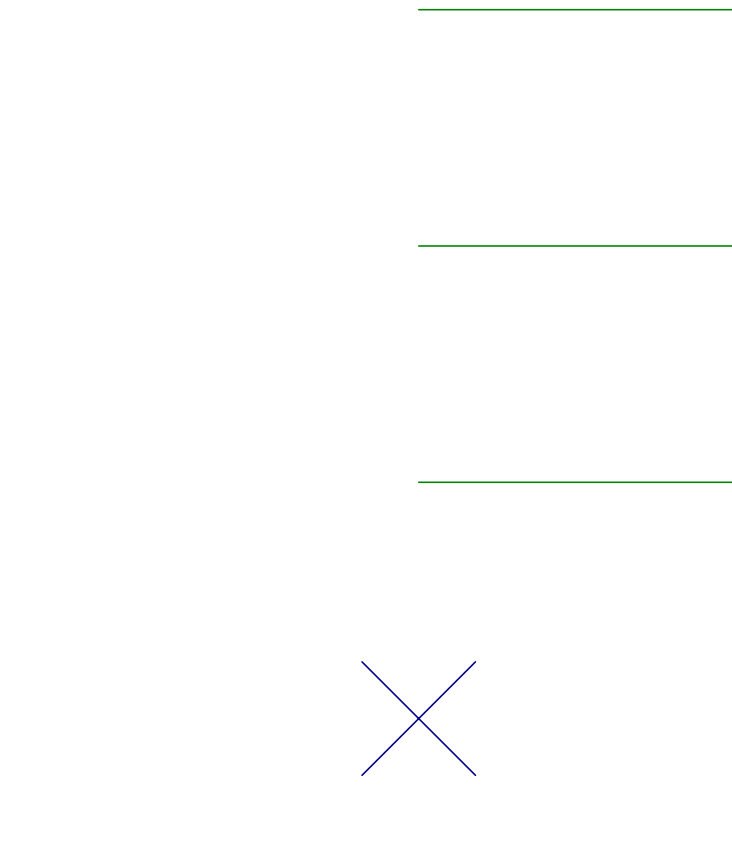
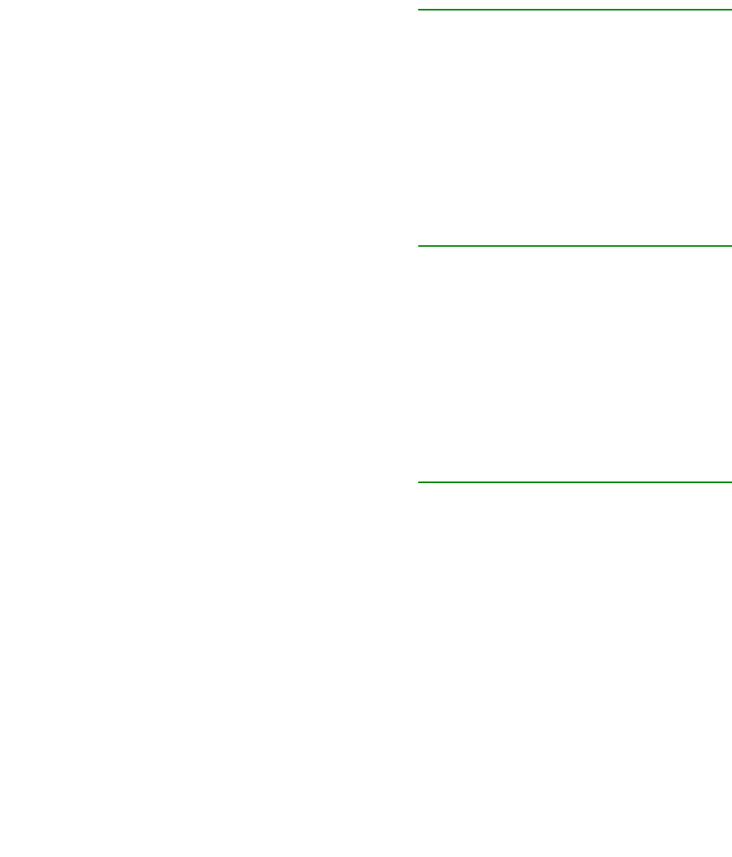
no-connect mark: (418, 718) -> none

